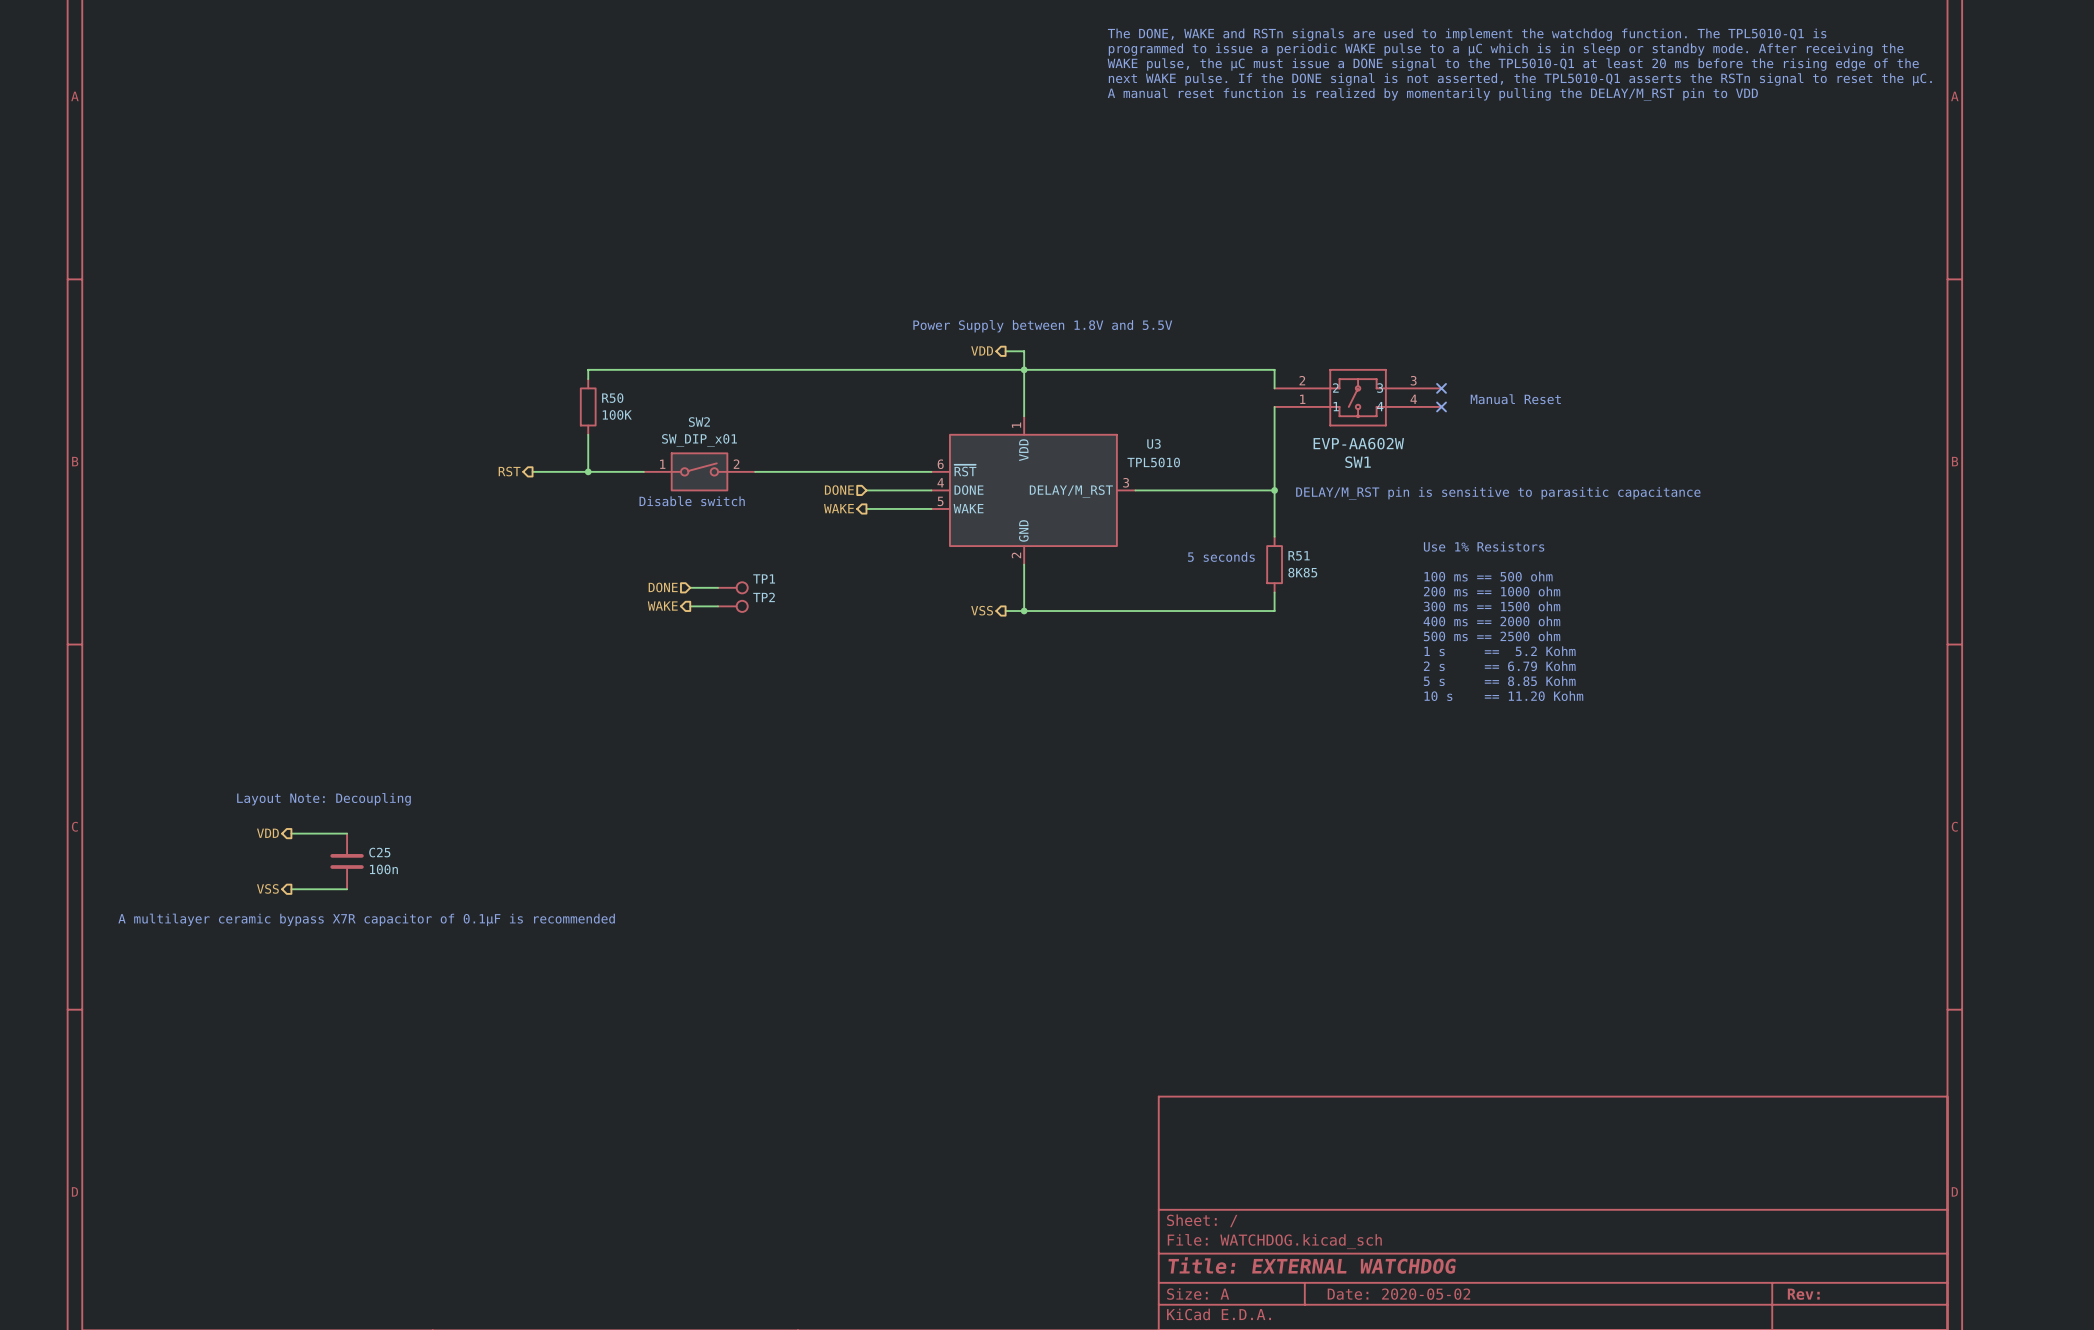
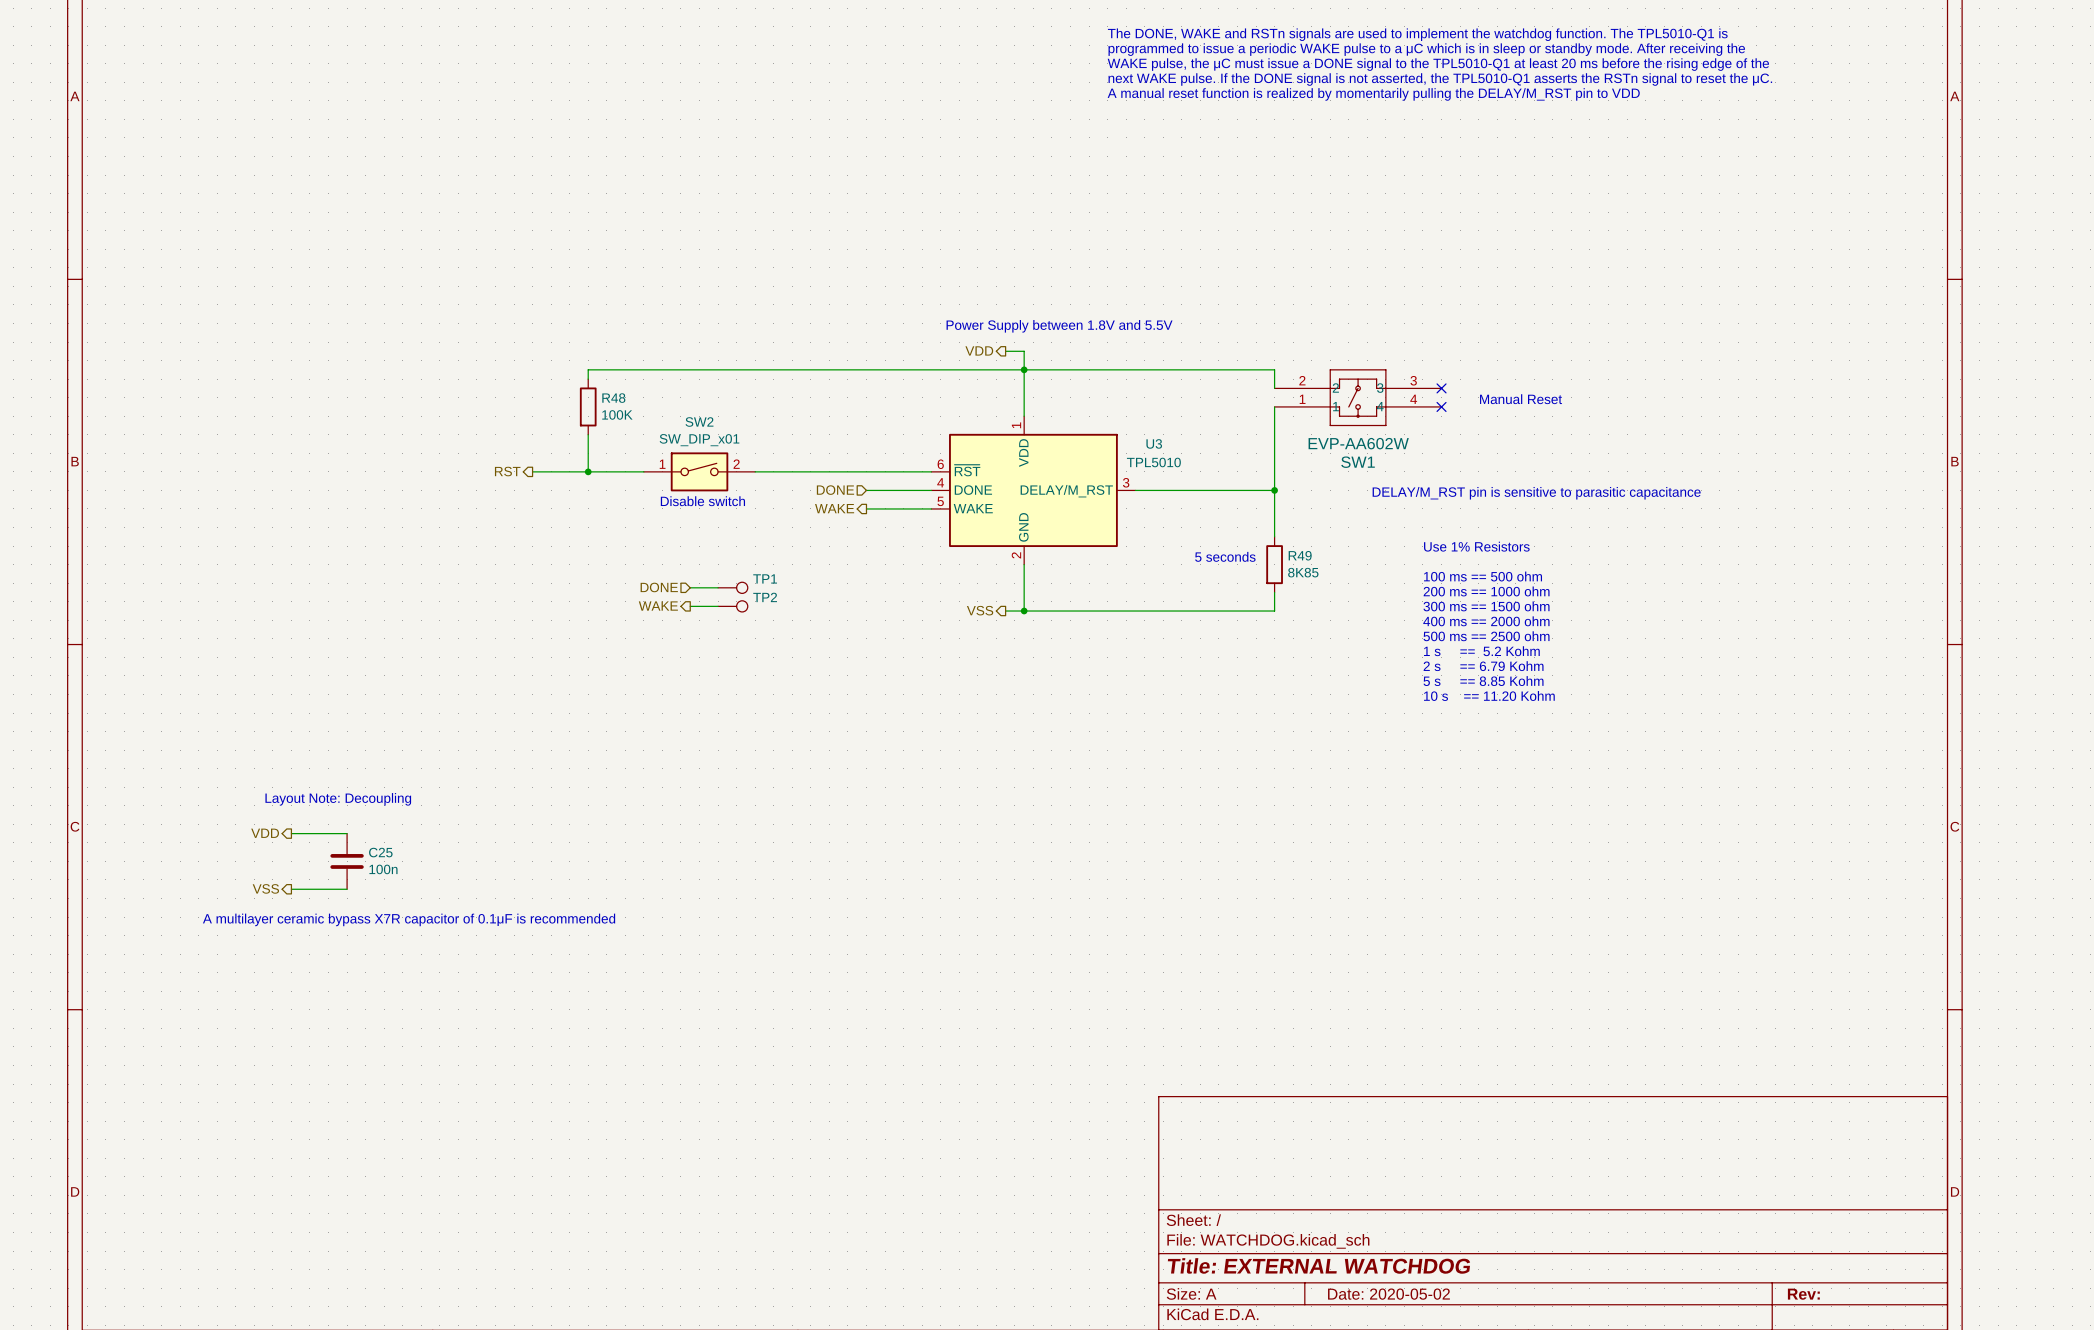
R50 name: R50 (612, 398) -> R48 (613, 398)
R51 name: R51 (1299, 555) -> R49 (1300, 555)

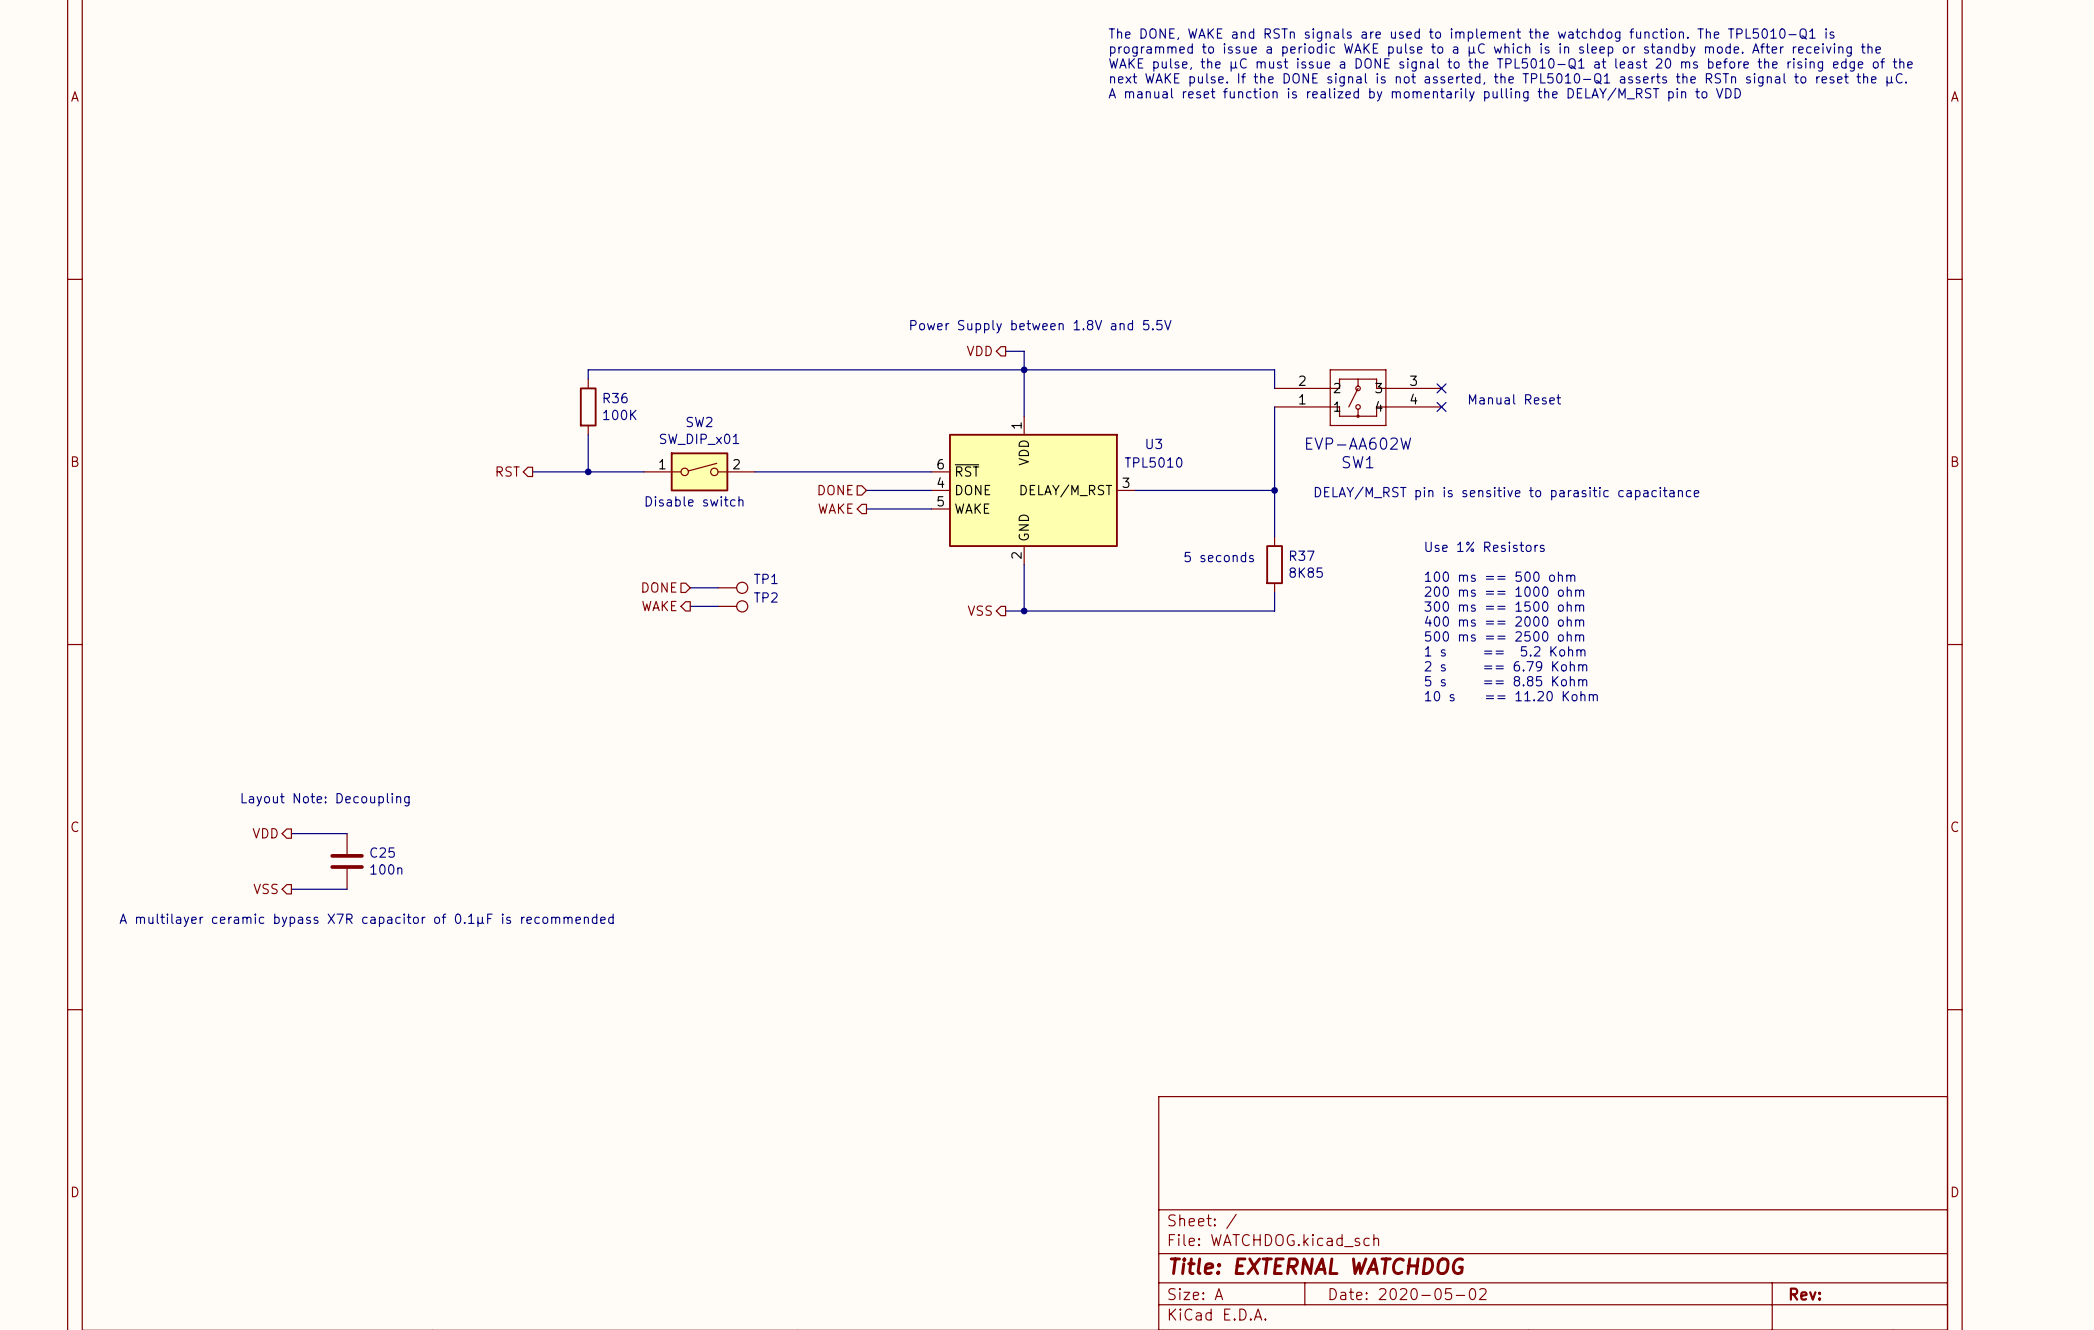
R48 name: R48 (613, 398) -> R36 (615, 398)
R49 name: R49 (1300, 555) -> R37 (1302, 555)

